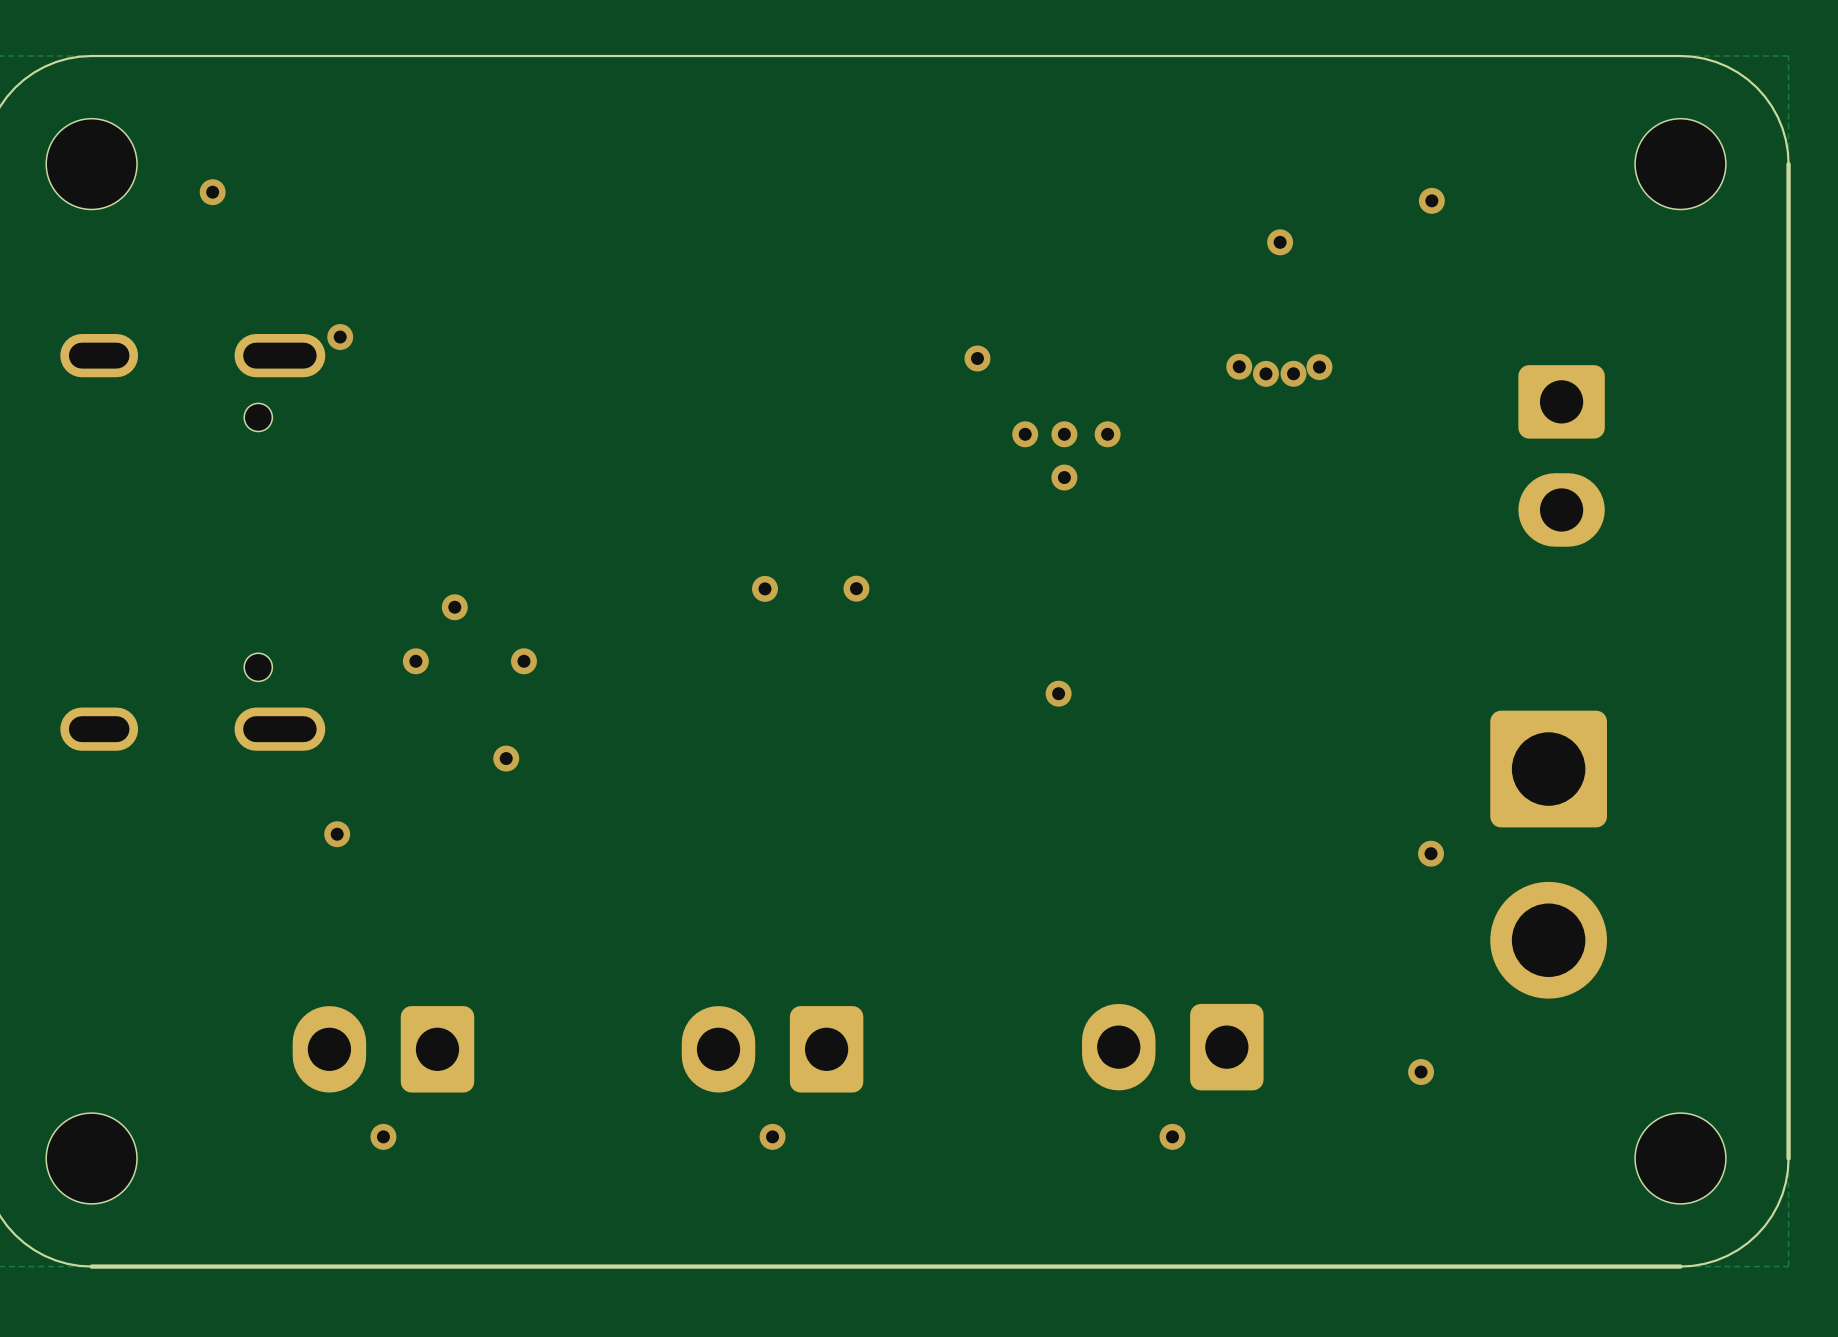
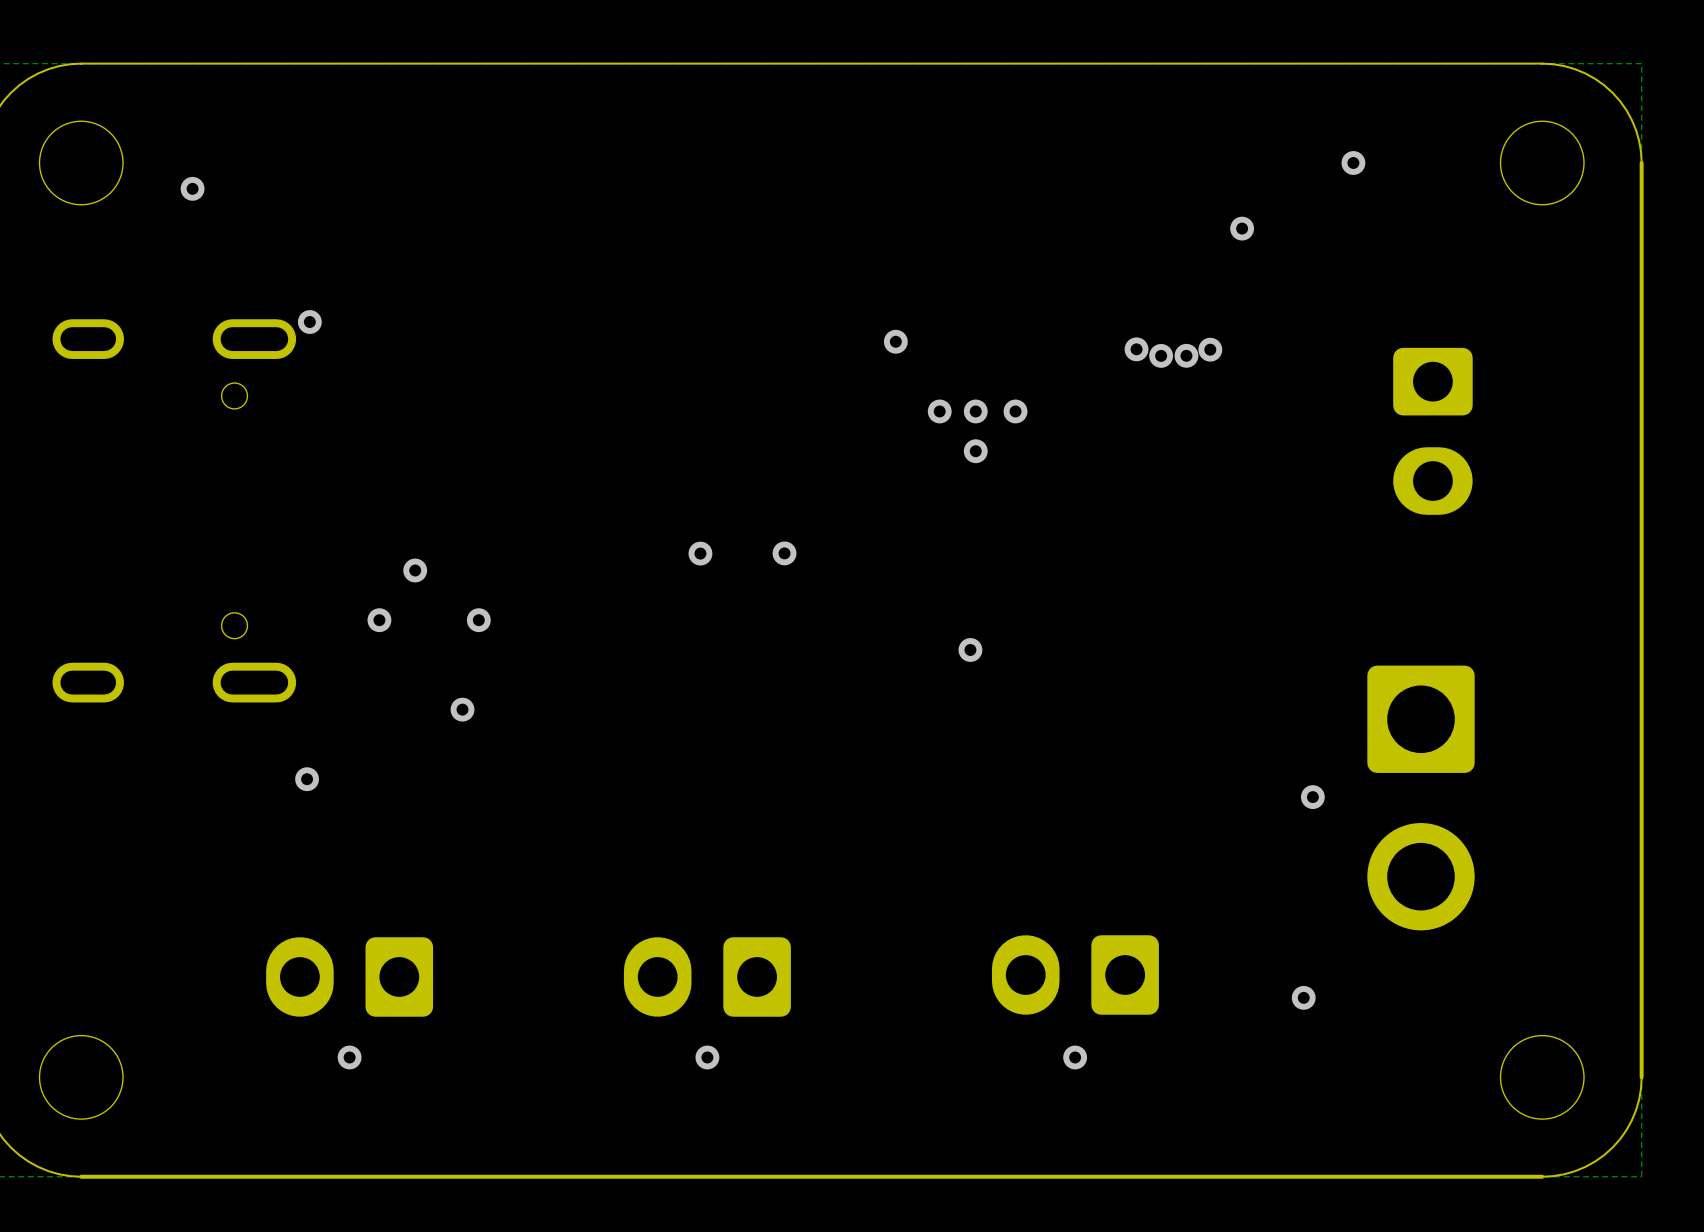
via: none -> (1353, 163)
via: (1431, 200) -> none
via: none -> (1242, 228)
via: (1280, 242) -> none

